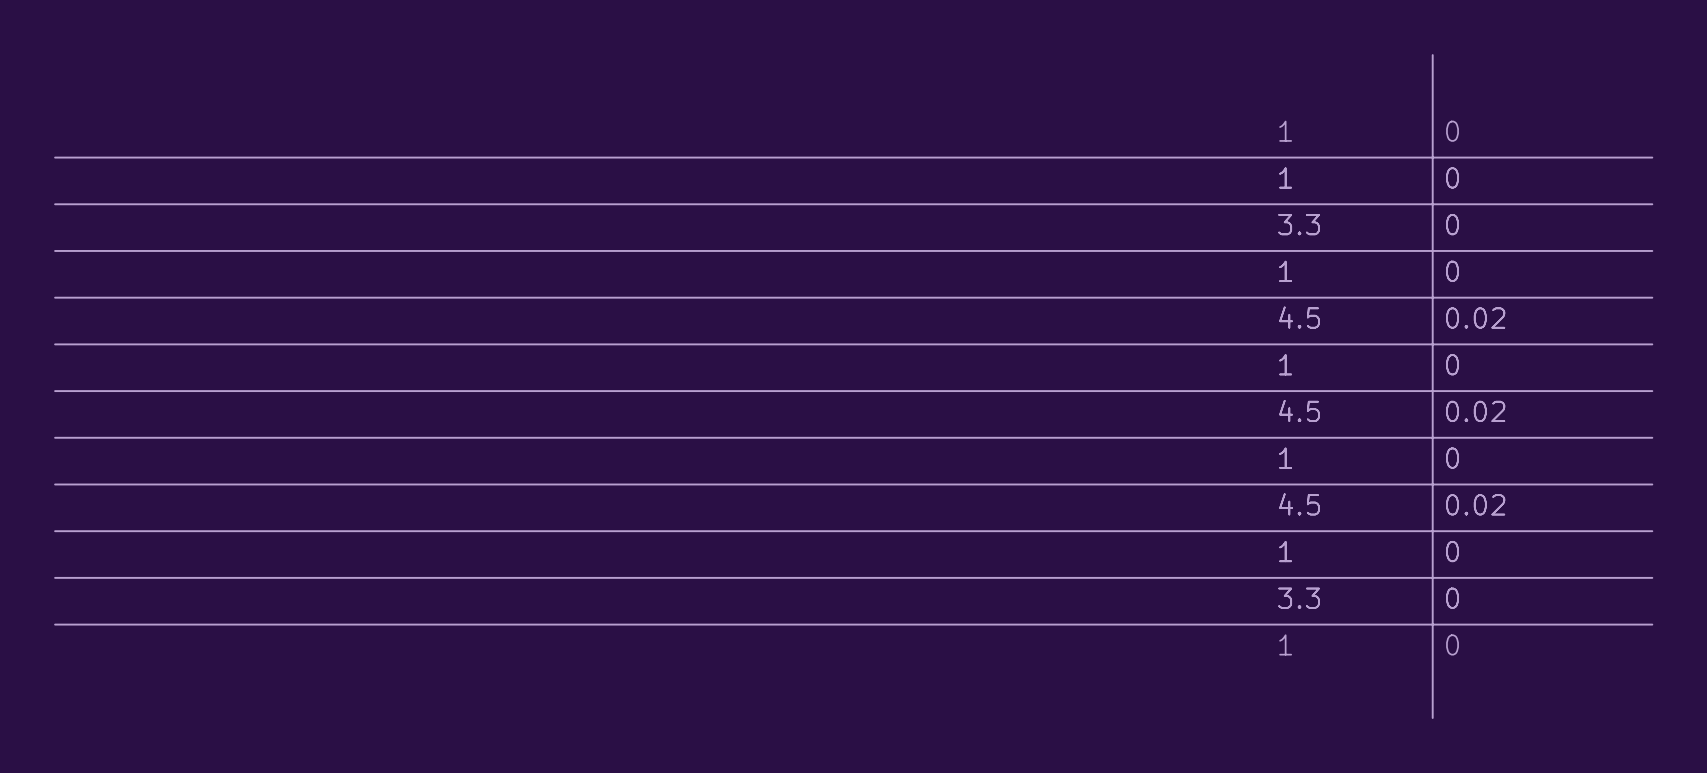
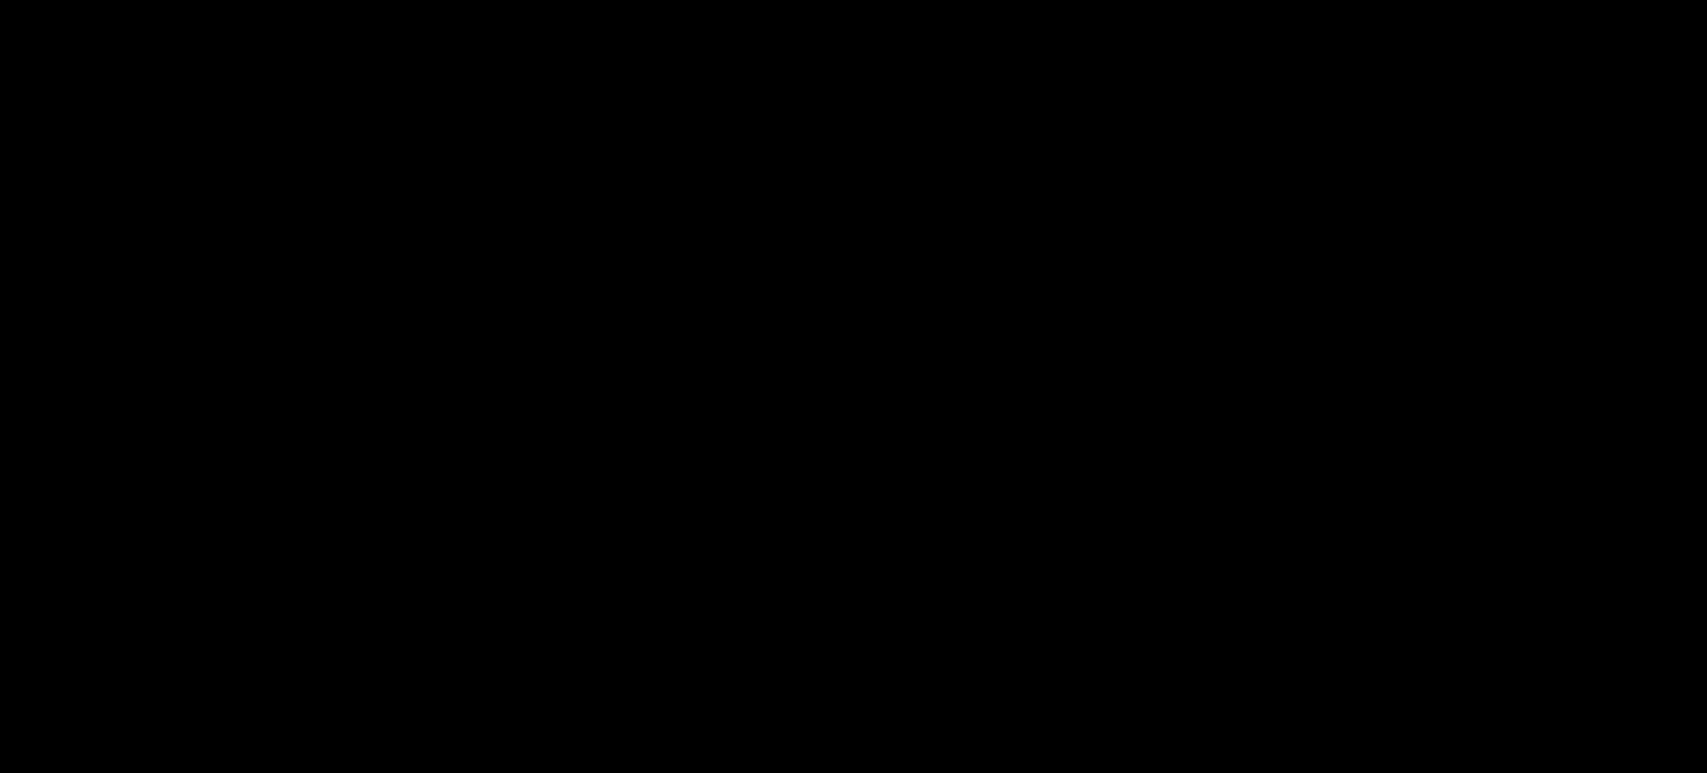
line: (1432, 55) (1432, 717) -> none
text: 1 (1285, 131) -> none
text: 0 (1452, 131) -> none
line: (55, 157) (1652, 157) -> none
text: 1 (1285, 177) -> none
text: 0 (1452, 177) -> none
line: (55, 204) (1652, 204) -> none
text: 3.3 (1299, 224) -> none
text: 0 (1452, 224) -> none
line: (55, 250) (1652, 250) -> none
text: 1 (1285, 271) -> none
text: 0 (1452, 271) -> none
line: (55, 297) (1652, 297) -> none
text: 4.5 (1299, 317) -> none
text: 0.02 (1475, 318) -> none
line: (55, 344) (1652, 344) -> none
text: 1 (1285, 364) -> none
text: 0 (1452, 364) -> none
line: (55, 391) (1652, 391) -> none
text: 4.5 (1299, 410) -> none
text: 0.02 (1475, 411) -> none
line: (55, 437) (1652, 437) -> none
text: 1 (1285, 458) -> none
text: 0 (1452, 458) -> none
line: (55, 484) (1652, 484) -> none
text: 4.5 (1299, 504) -> none
text: 0.02 (1475, 504) -> none
line: (55, 531) (1652, 531) -> none
text: 1 (1285, 551) -> none
text: 0 (1452, 551) -> none
line: (55, 577) (1652, 577) -> none
text: 3.3 (1299, 598) -> none
text: 0 (1452, 598) -> none
line: (55, 624) (1652, 624) -> none
text: 1 (1285, 644) -> none
text: 0 (1452, 644) -> none

